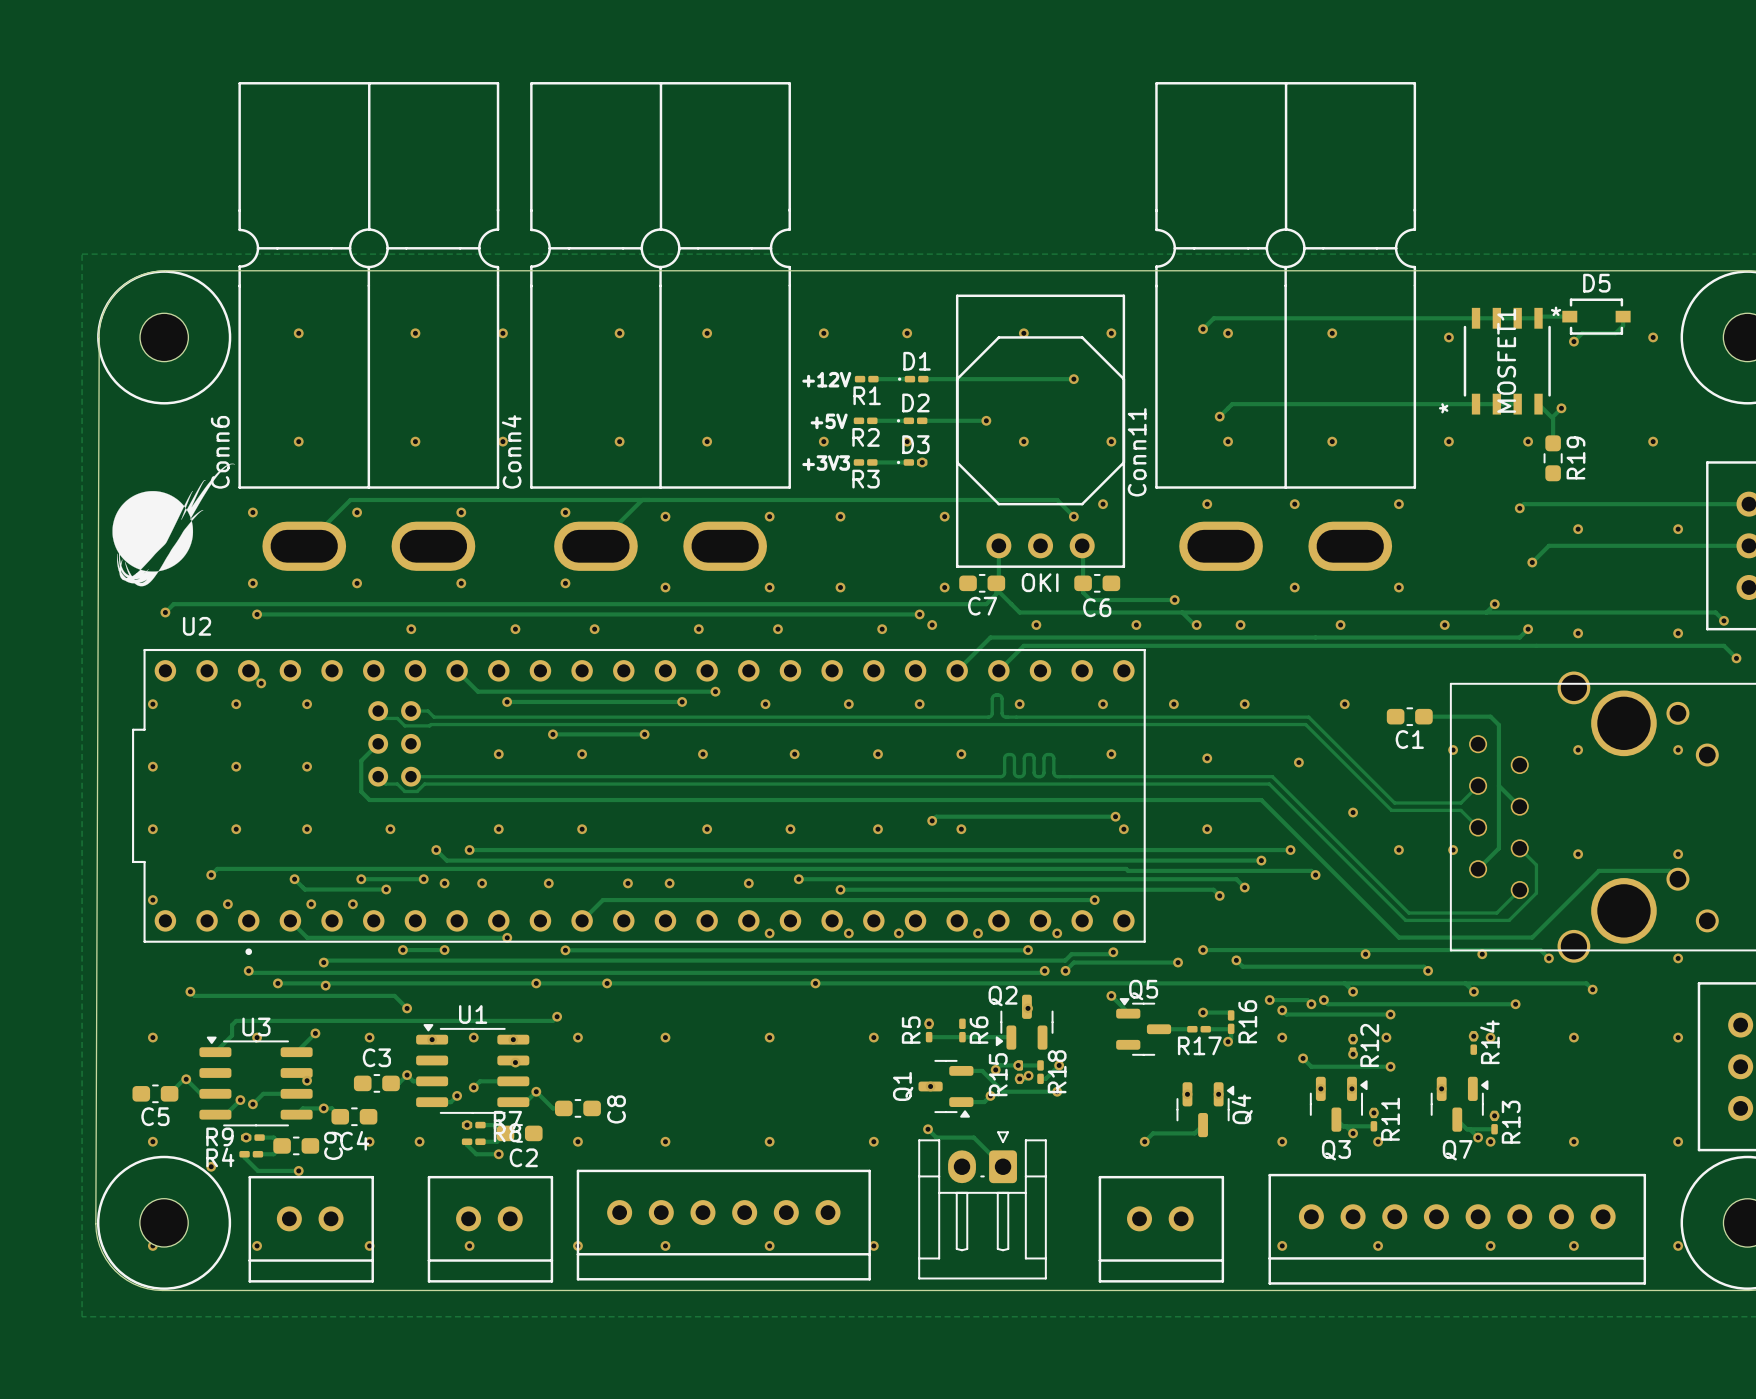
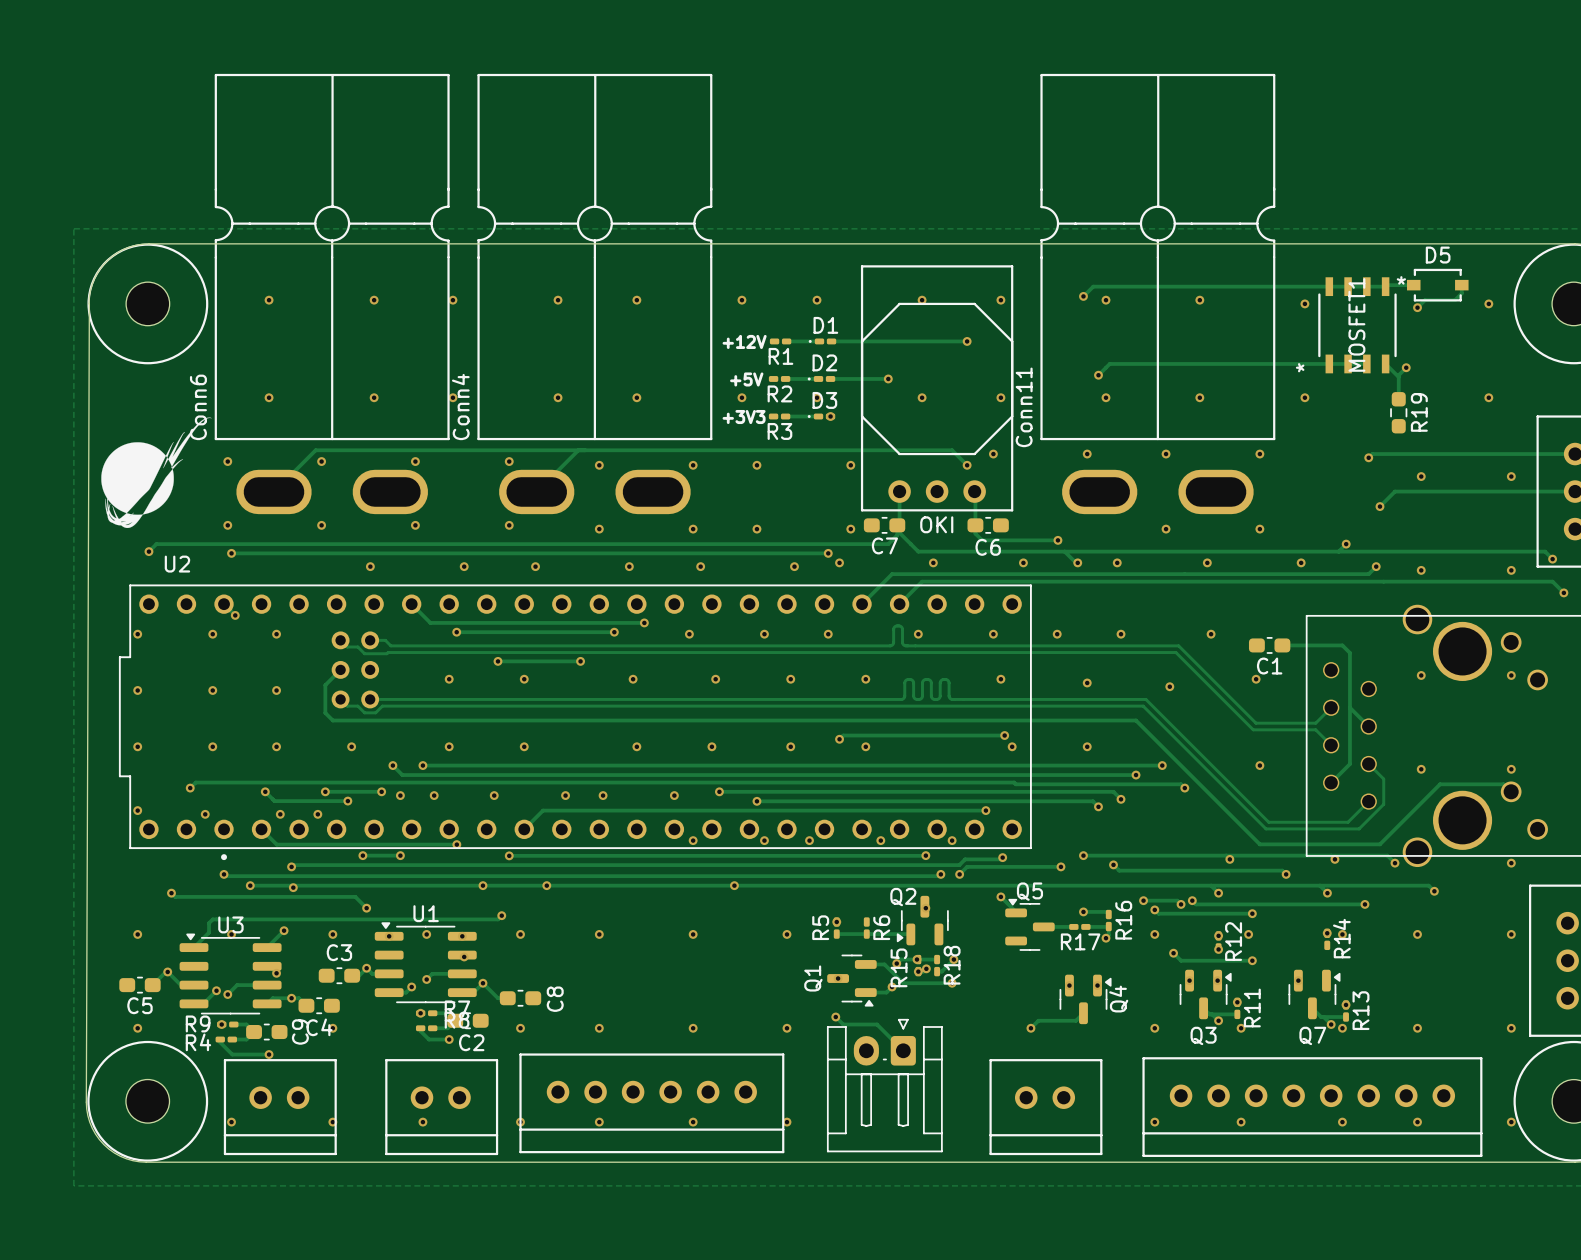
via: (1528, 441) -> none
via: (1453, 750) -> none
via: none -> (1256, 679)
via: (1353, 812) -> none
via: (1453, 850) -> none
via: (419, 1141) -> none
via: (211, 1166) -> none
via: (152, 1245) -> none

